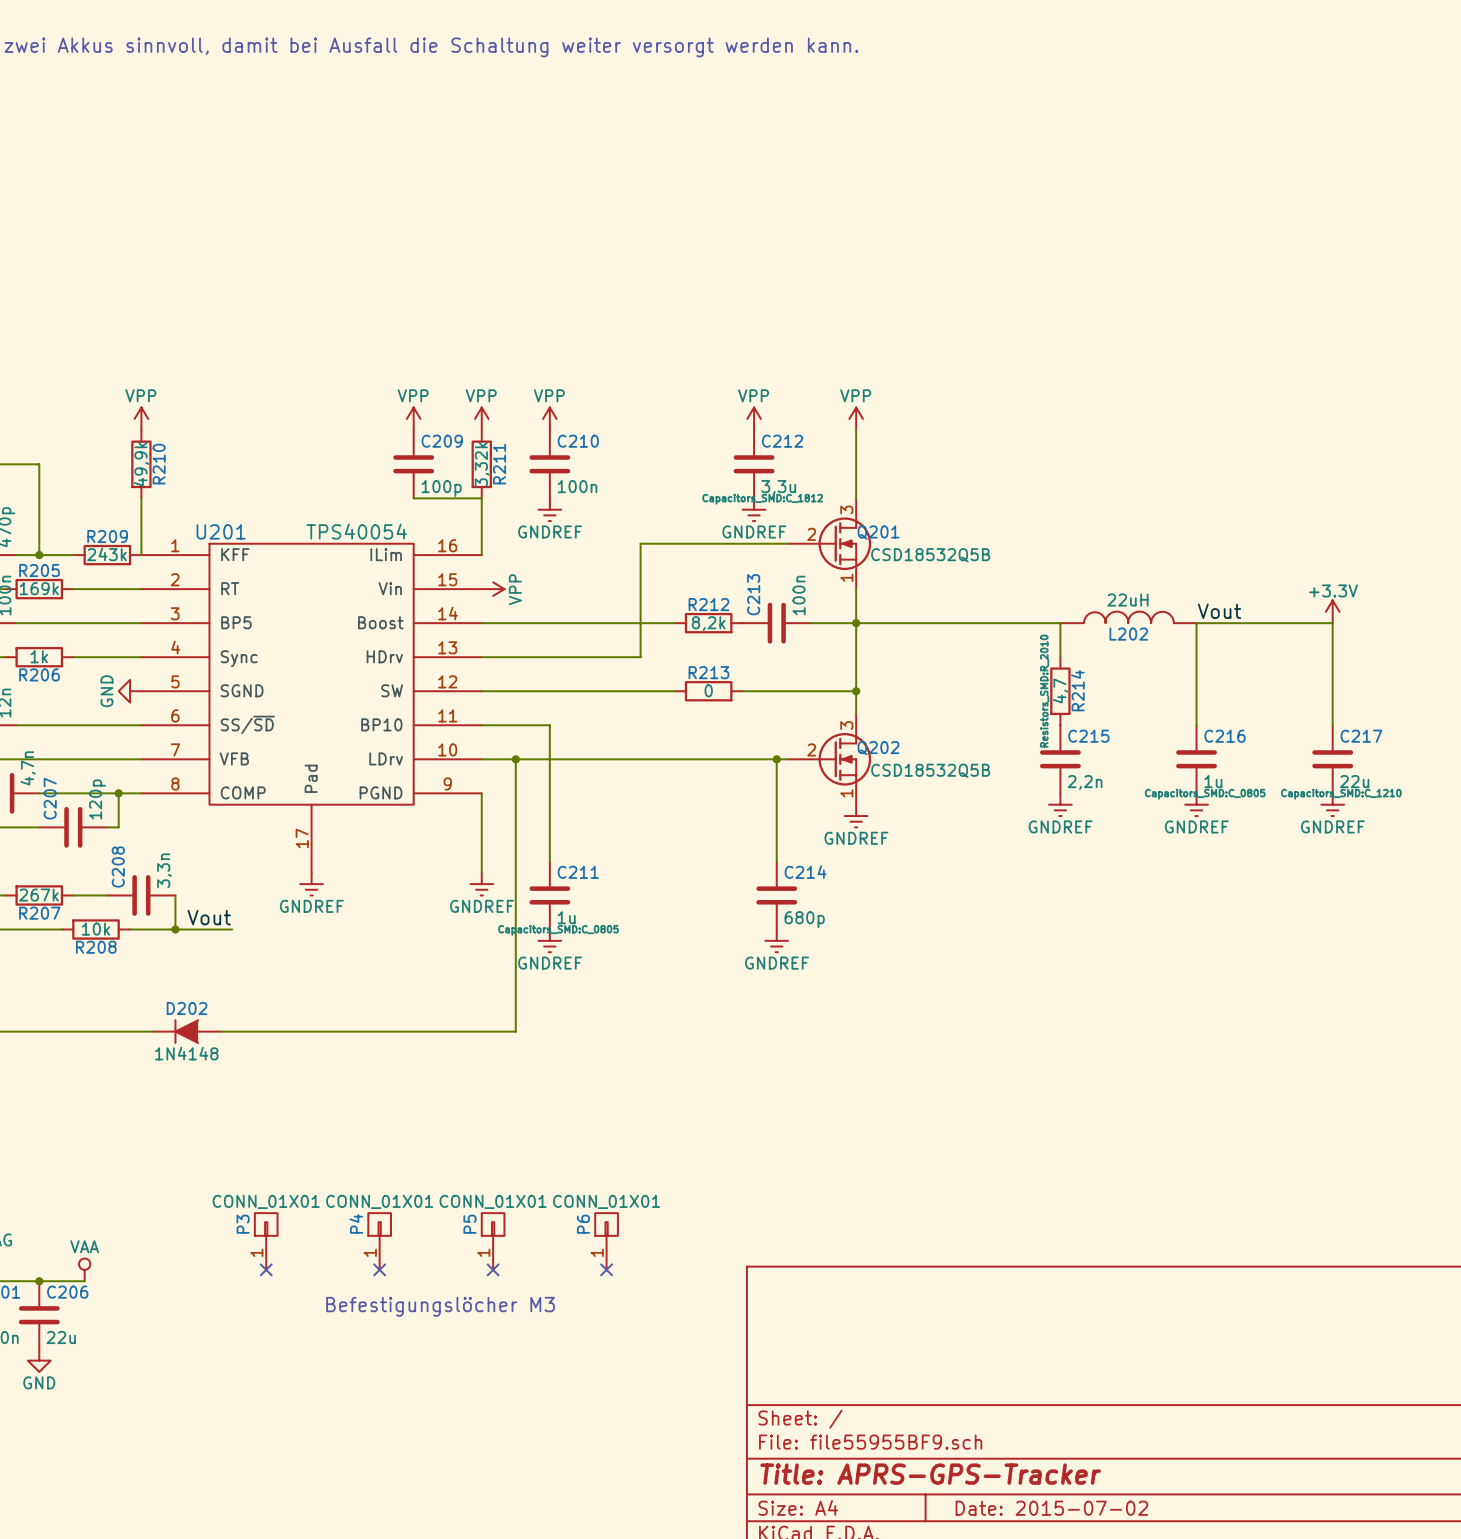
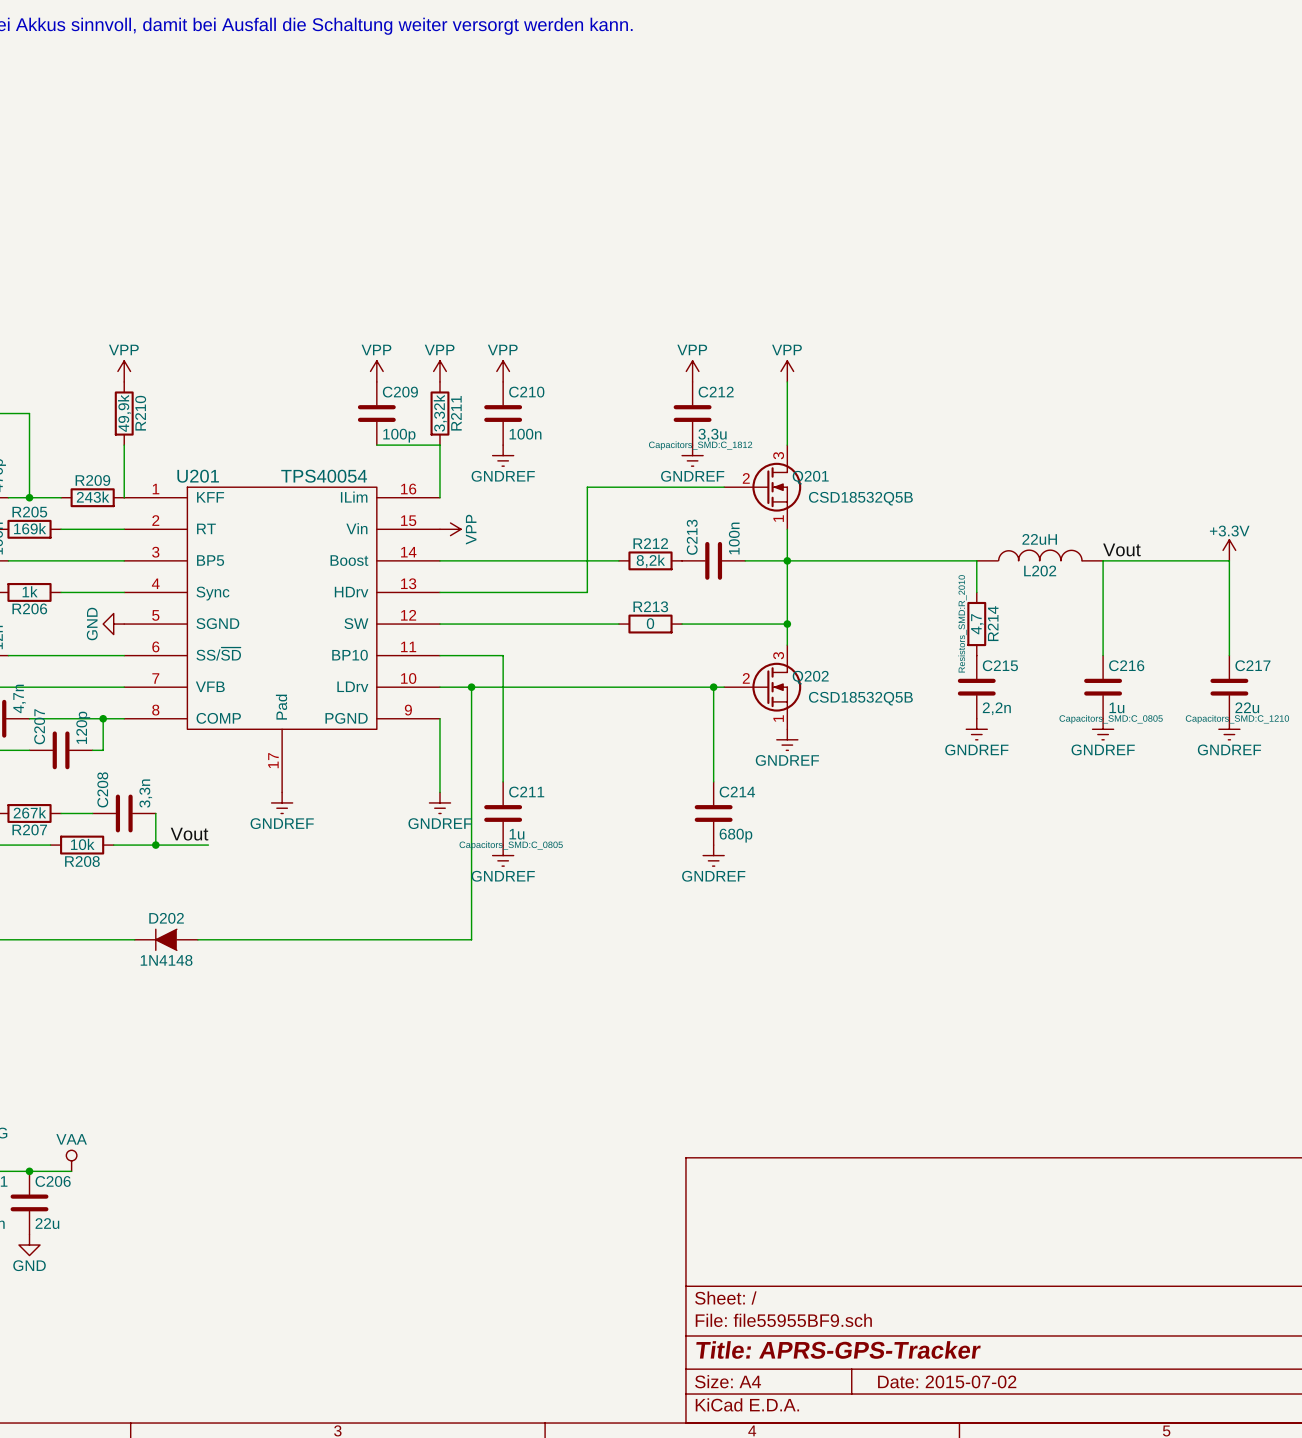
P3: CONN_01X01 (266, 1241) -> none
P4: CONN_01X01 (379, 1241) -> none
P5: CONN_01X01 (493, 1241) -> none
P6: CONN_01X01 (606, 1241) -> none
no-connect mark: (266, 1269) -> none
no-connect mark: (379, 1269) -> none
no-connect mark: (493, 1269) -> none
no-connect mark: (606, 1269) -> none
text: Befestigungslöcher M3 (440, 1306) -> none

